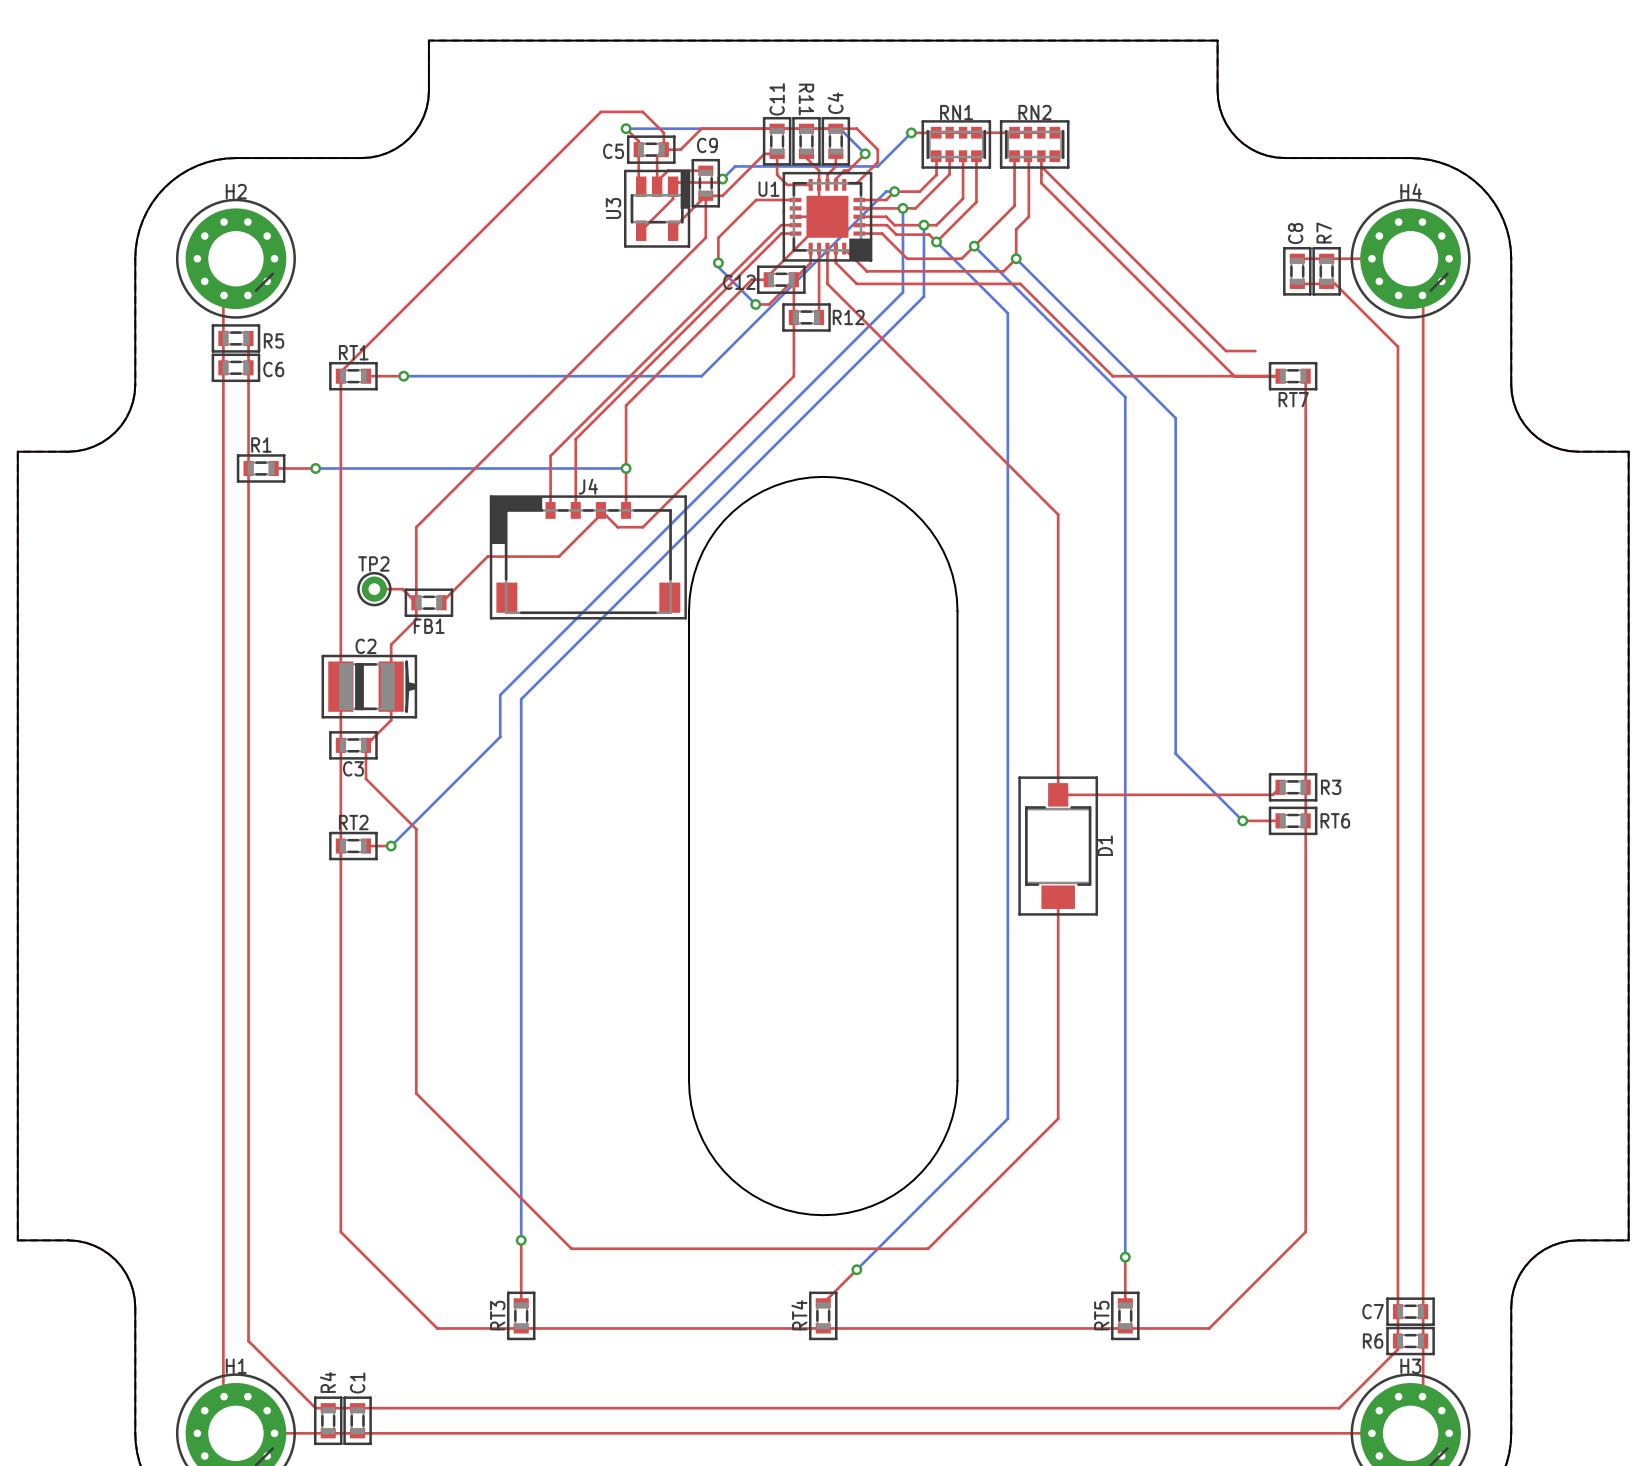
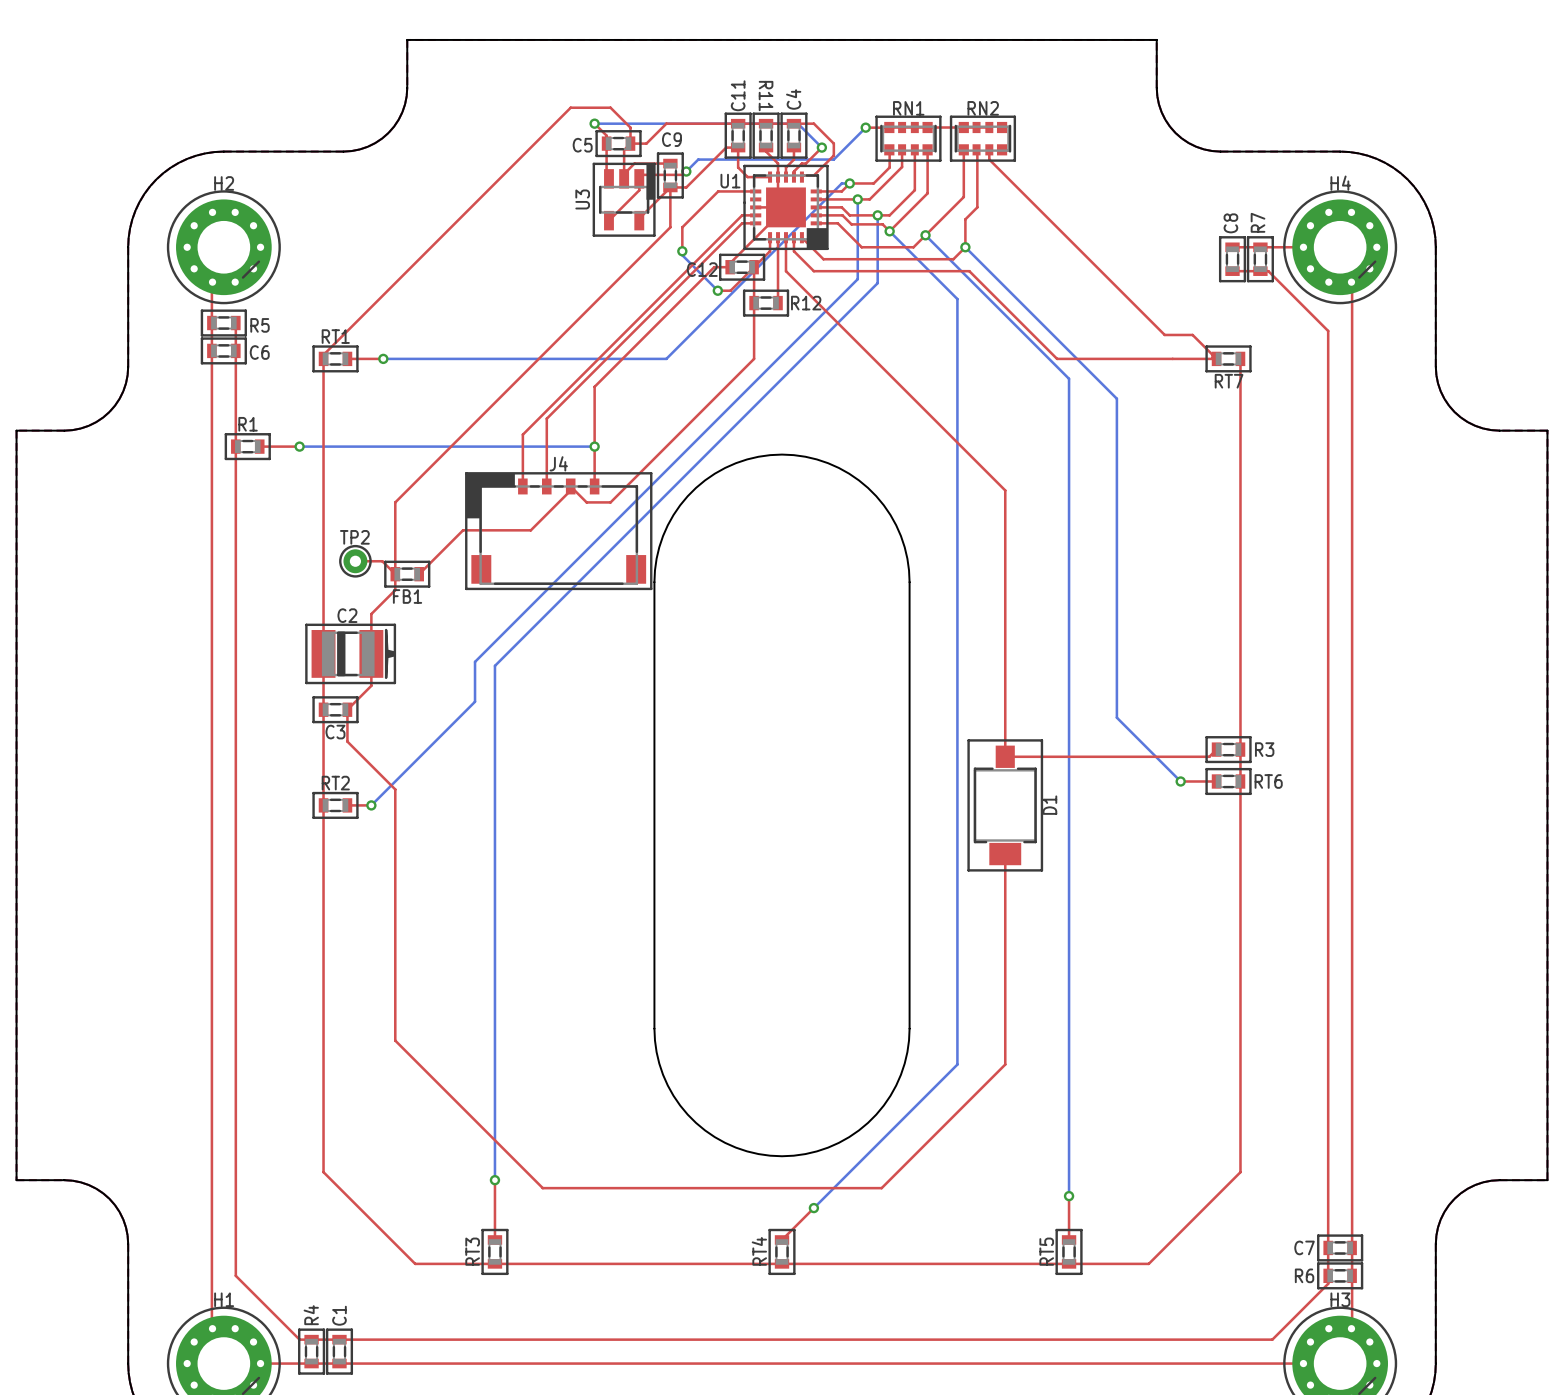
top track: (1041, 166) (1041, 183) (1234, 376) -> none
top track: none -> (1192, 334) (1212, 354) (1212, 358)

